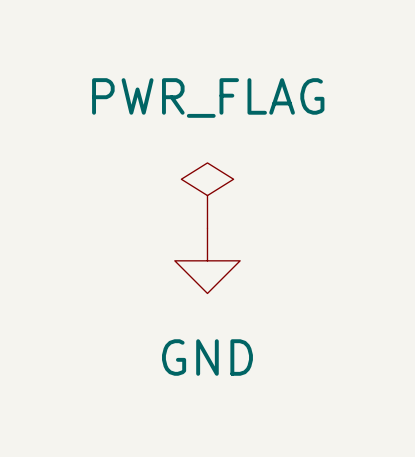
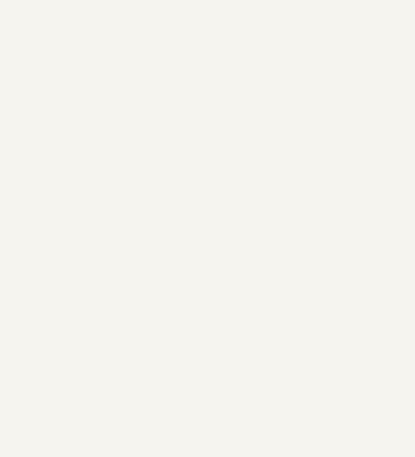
power symbol: PWR_FLAG (207, 195) -> none
power symbol: GND (207, 260) -> none

